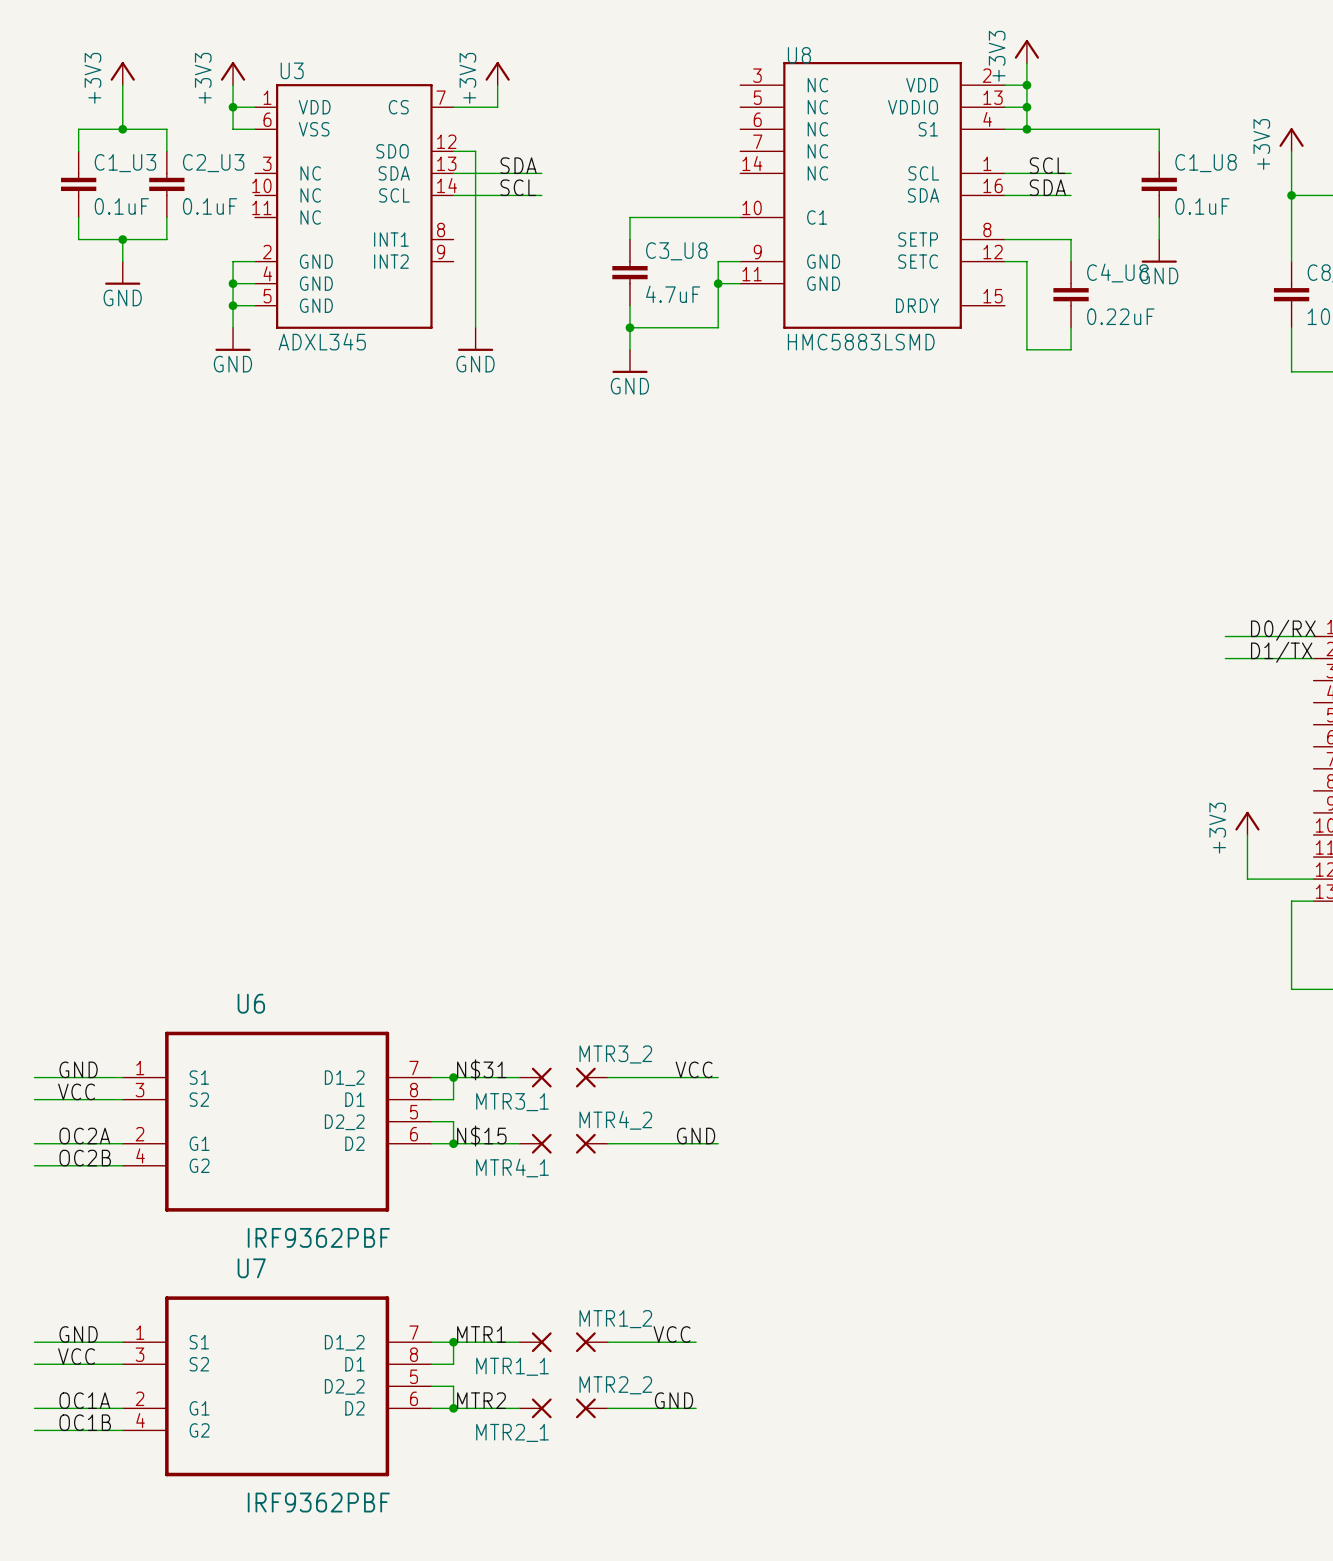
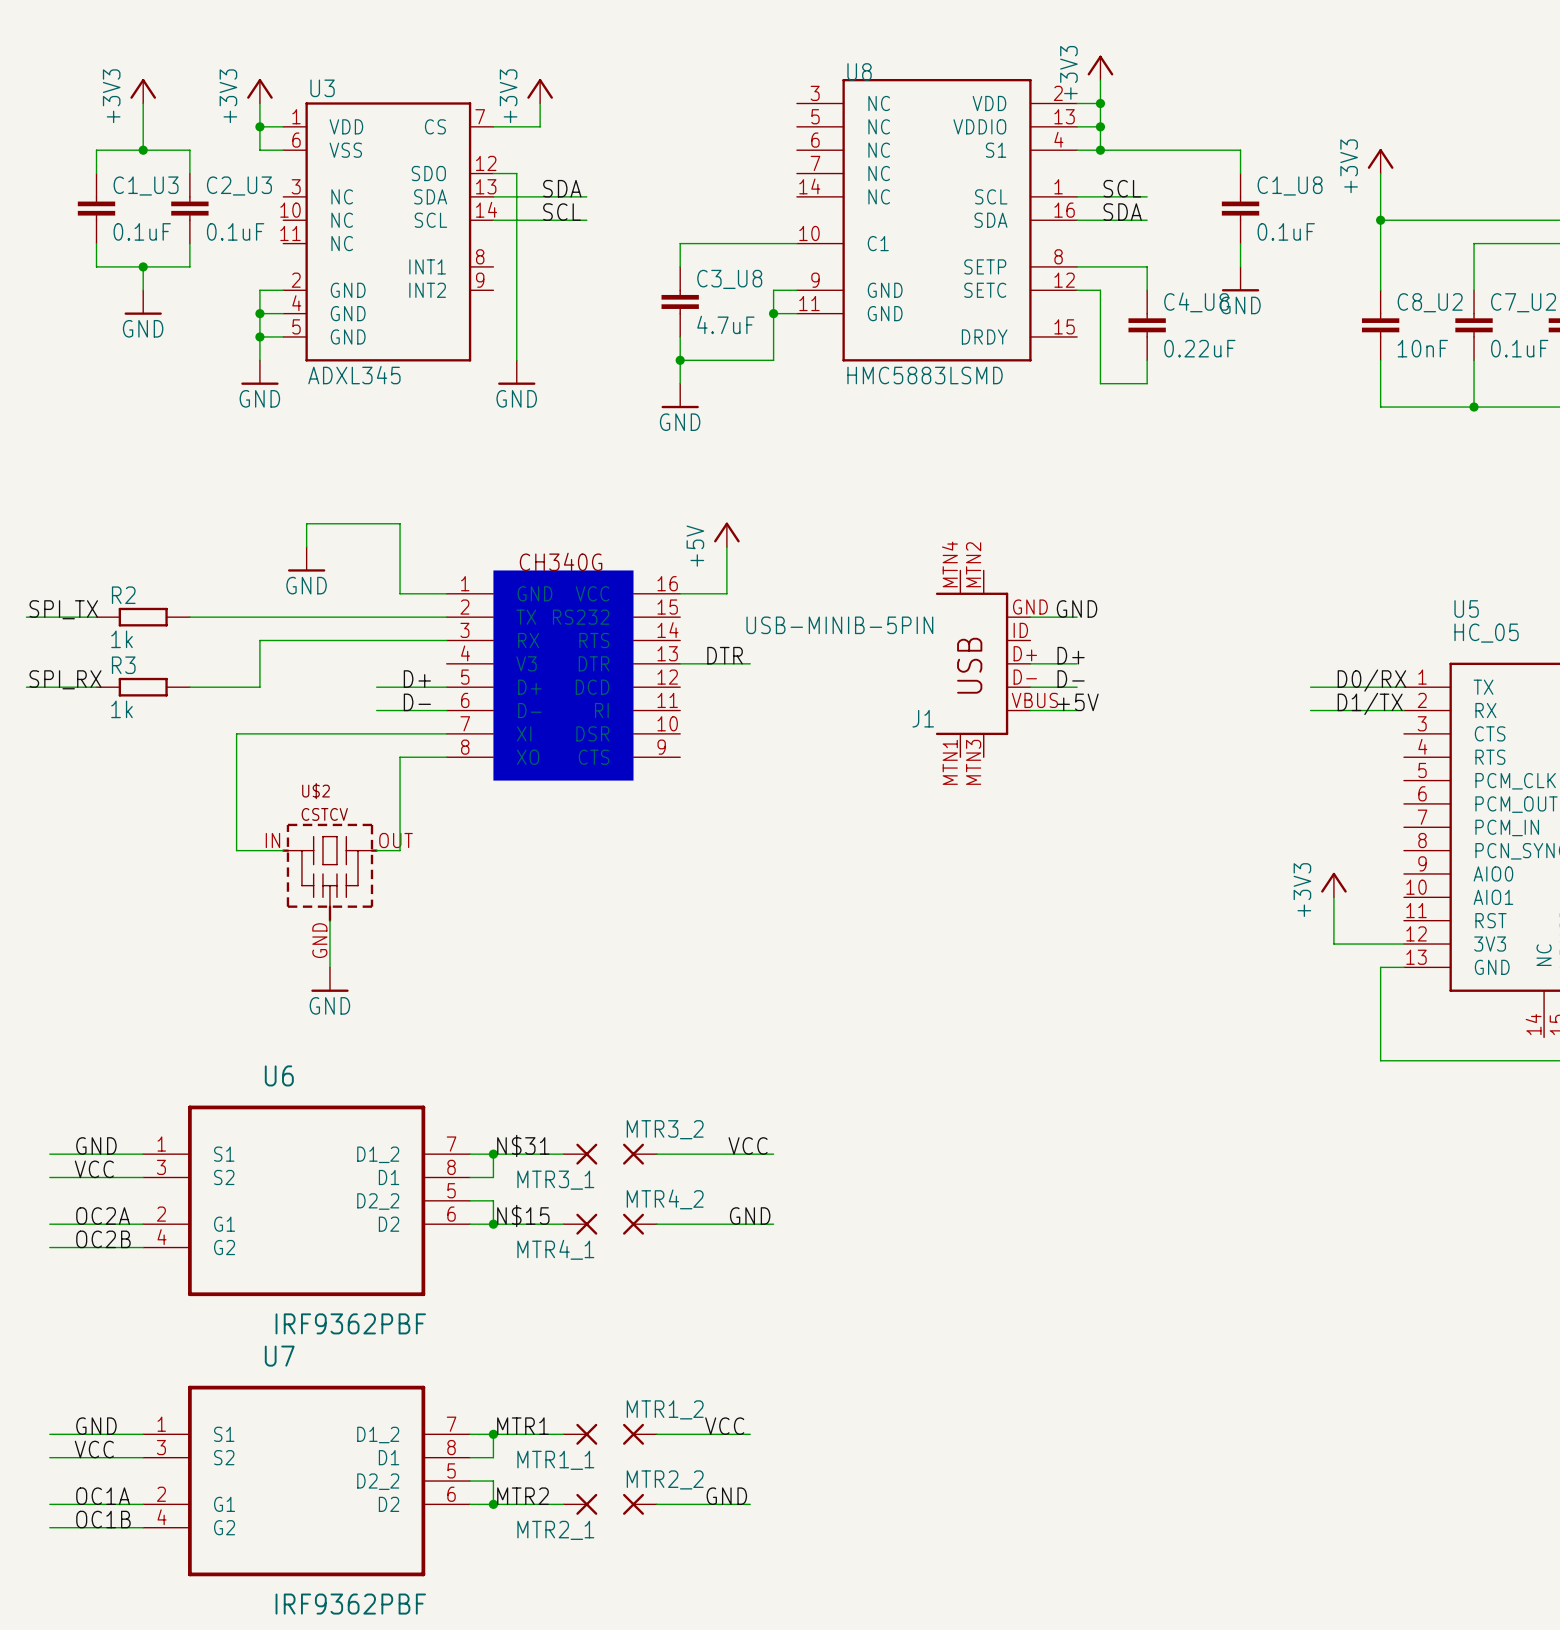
power symbol: none -> +5V (726, 534)
wire: none -> (306, 547) (306, 523) (400, 523) (400, 593) (446, 593)
wire: none -> (726, 547) (726, 593) (680, 593)
power symbol: none -> GND (306, 559)
label: none -> GND (1077, 608)
label: none -> SPI_TX (63, 609)
wire: none -> (26, 617) (96, 617)
R2: none -> 1k (143, 617)
wire: none -> (189, 617) (446, 617)
wire: none -> (1030, 617) (1077, 617)
wire: none -> (446, 640) (259, 640) (259, 687) (189, 687)
label: none -> DTR (725, 655)
label: none -> D+ (1071, 655)
wire: none -> (680, 663) (750, 663)
J1: none -> USB-MINIB-5PIN (983, 663)
wire: none -> (1030, 663) (1077, 663)
part: none -> (563, 675)
label: none -> D+ (417, 679)
label: none -> D- (1071, 679)
label: none -> SPI_RX (65, 679)
wire: none -> (26, 687) (96, 687)
R3: none -> 1k (143, 687)
wire: none -> (376, 687) (446, 687)
wire: none -> (1030, 687) (1077, 687)
label: none -> D- (417, 702)
label: none -> +5V (1078, 702)
wire: none -> (376, 710) (446, 710)
wire: none -> (1030, 710) (1077, 710)
wire: none -> (446, 733) (236, 733) (236, 850) (283, 850)
wire: none -> (446, 757) (400, 757) (400, 850) (376, 850)
U$2: none -> CSTCV (329, 872)
wire: none -> (329, 920) (329, 967)
power symbol: none -> GND (329, 979)

